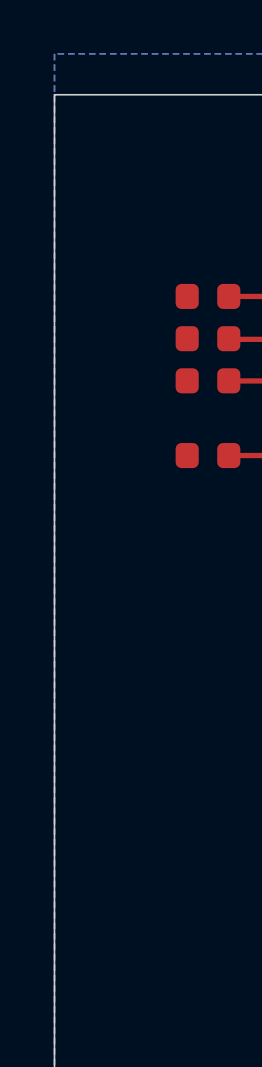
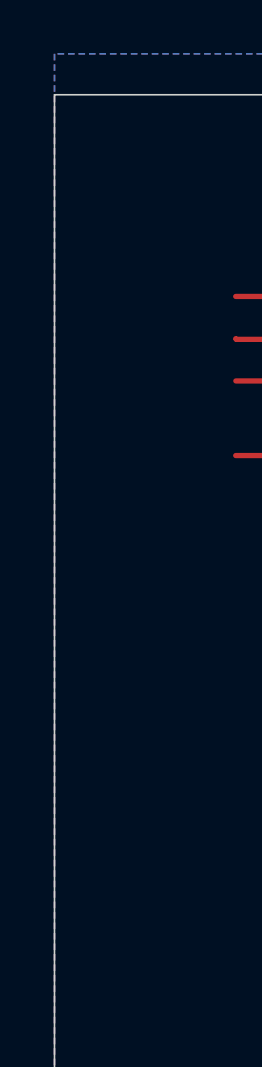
part: (207, 296) -> none
part: (207, 338) -> none
part: (207, 380) -> none
part: (207, 455) -> none

